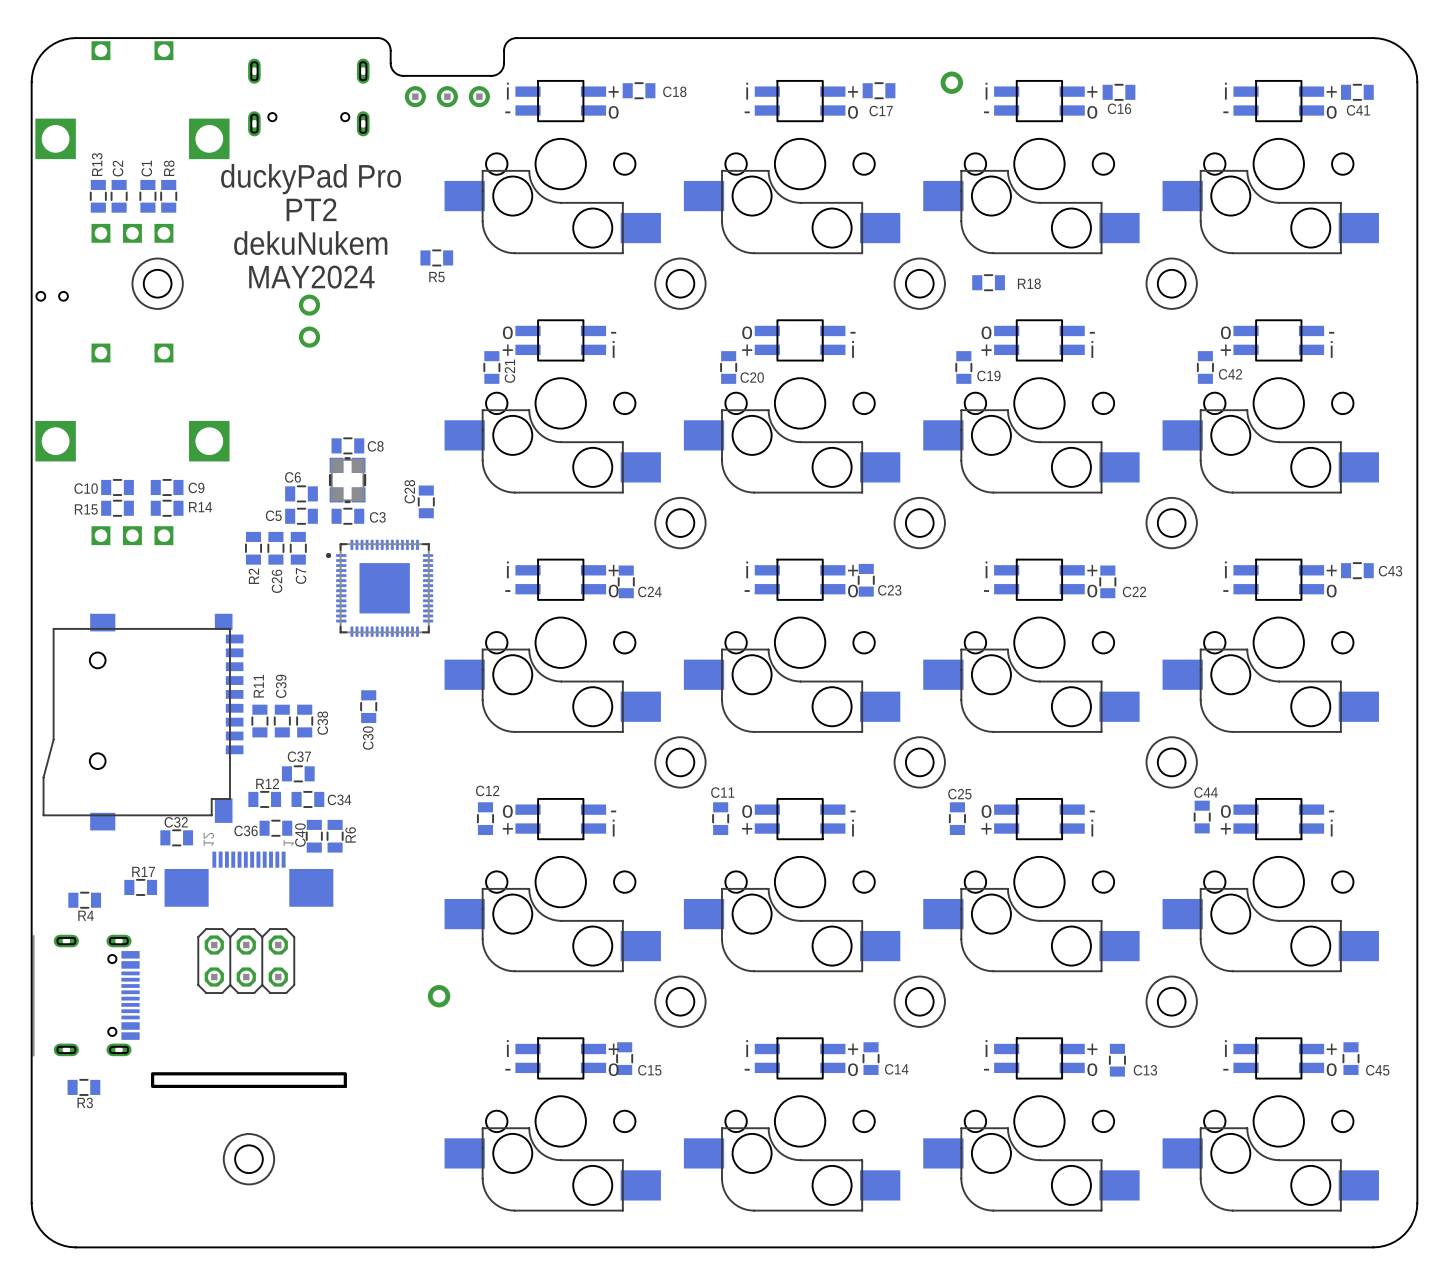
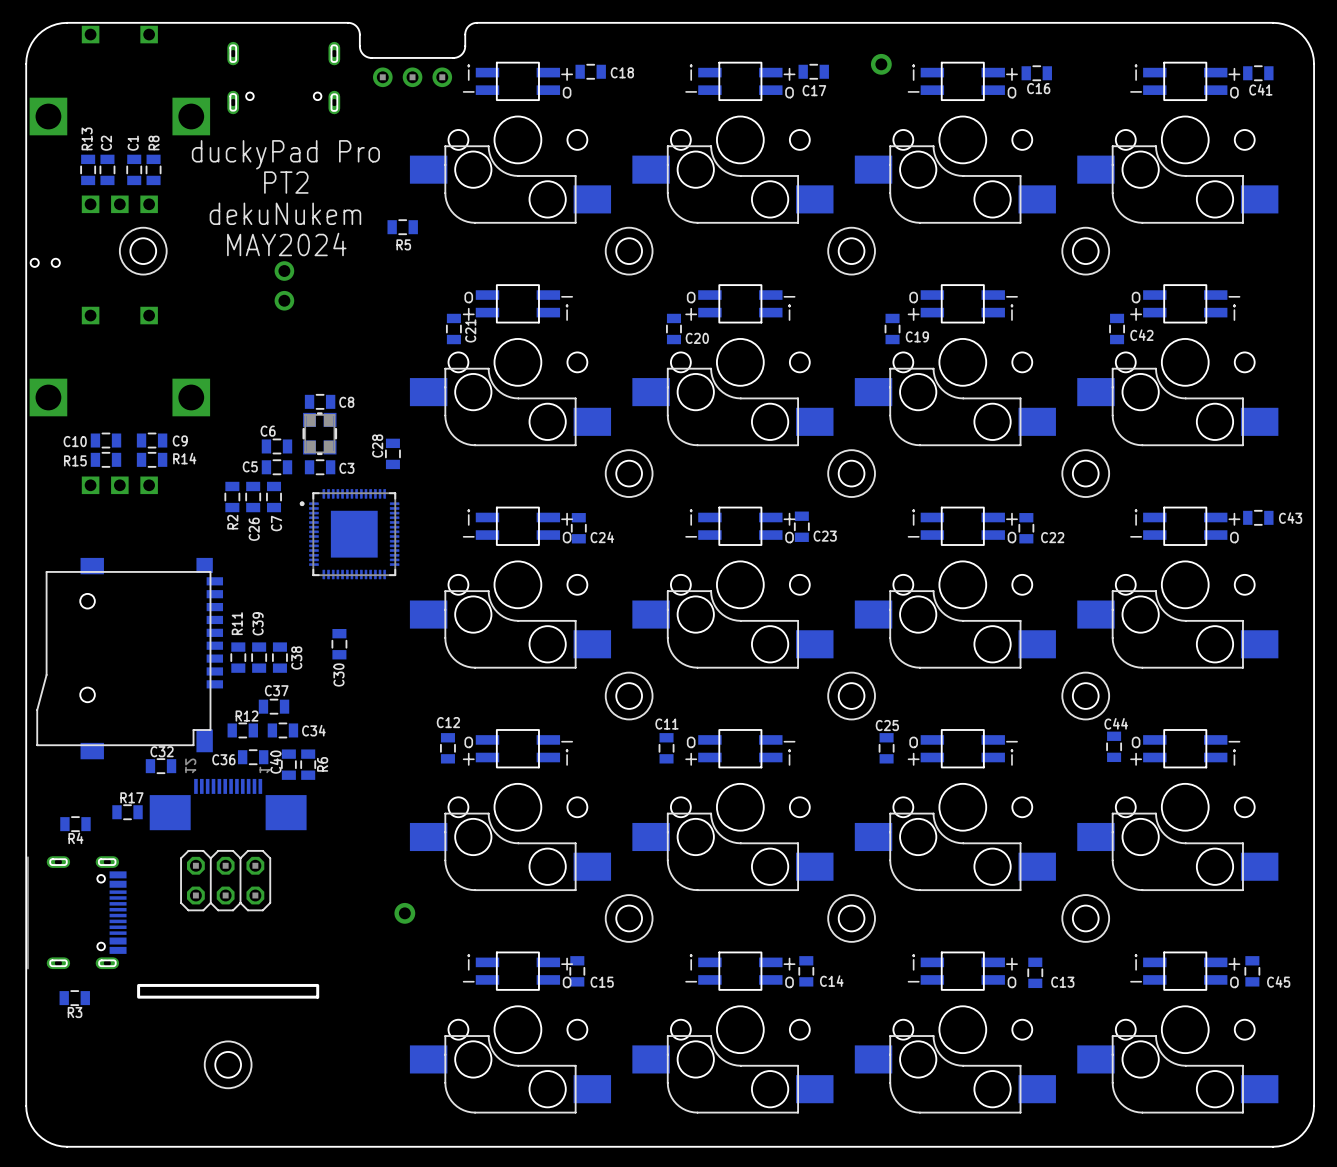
R18: (988, 282) -> none

